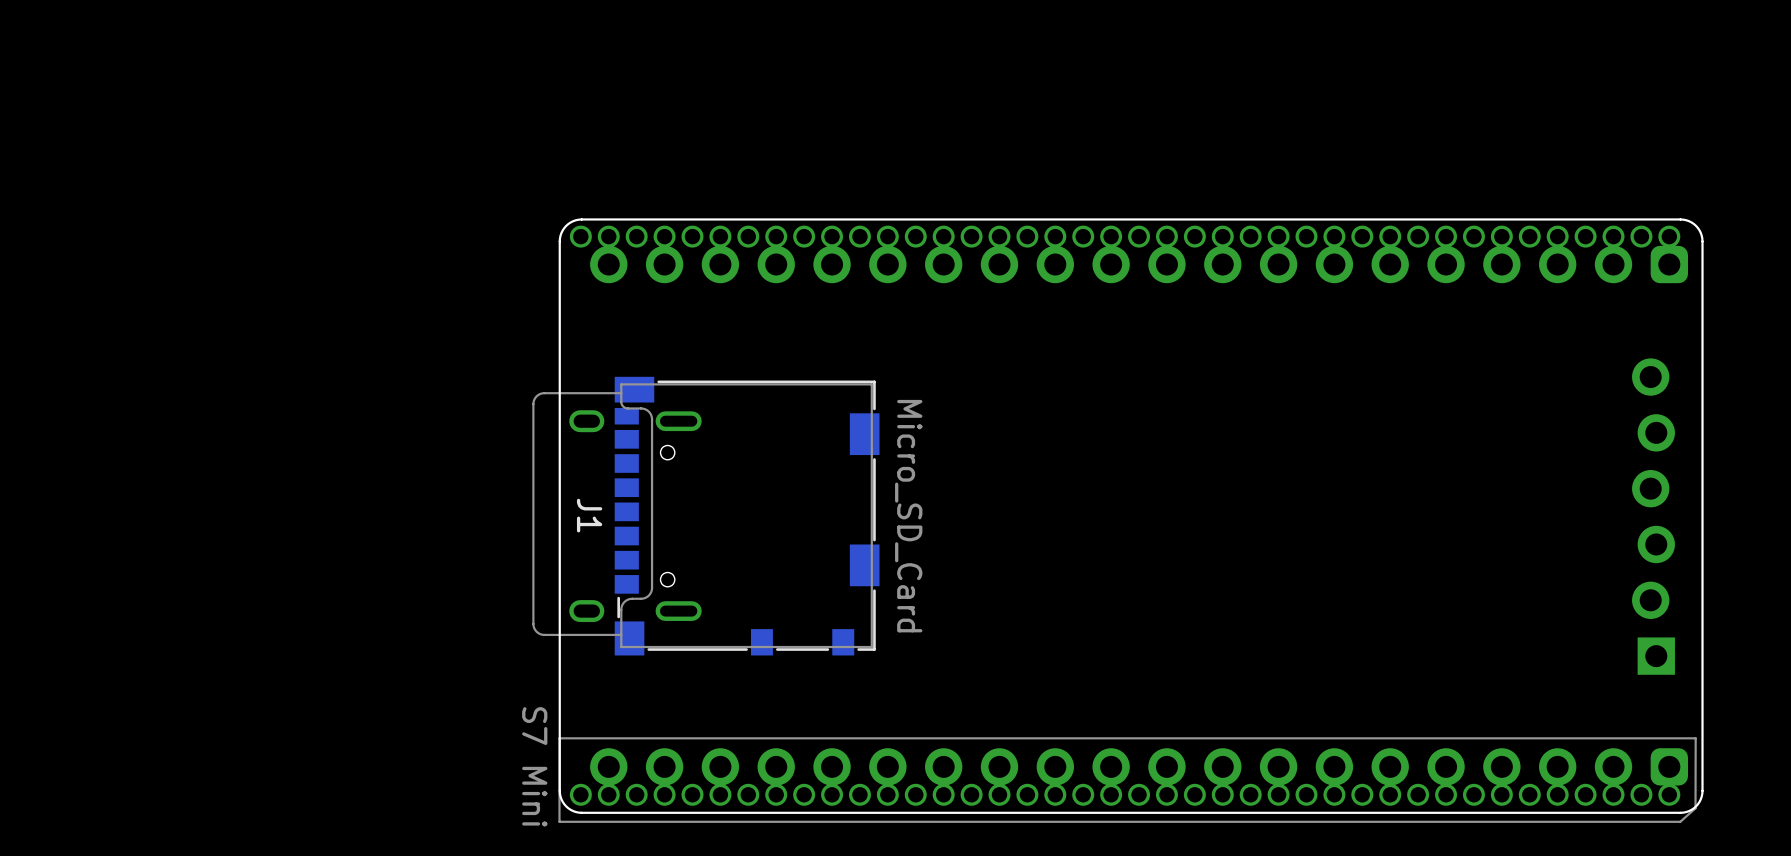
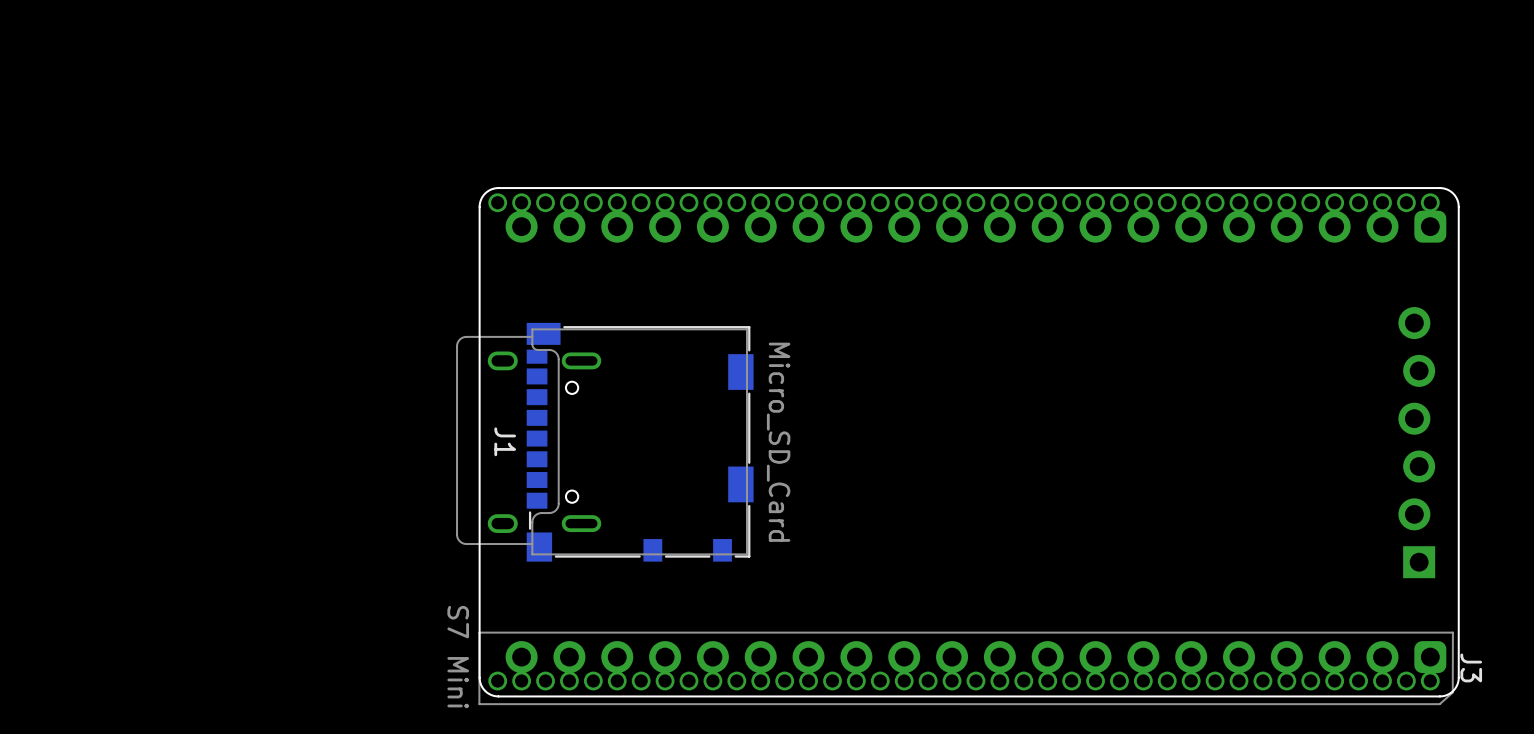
J3 name: none -> J3 (1471, 667)

